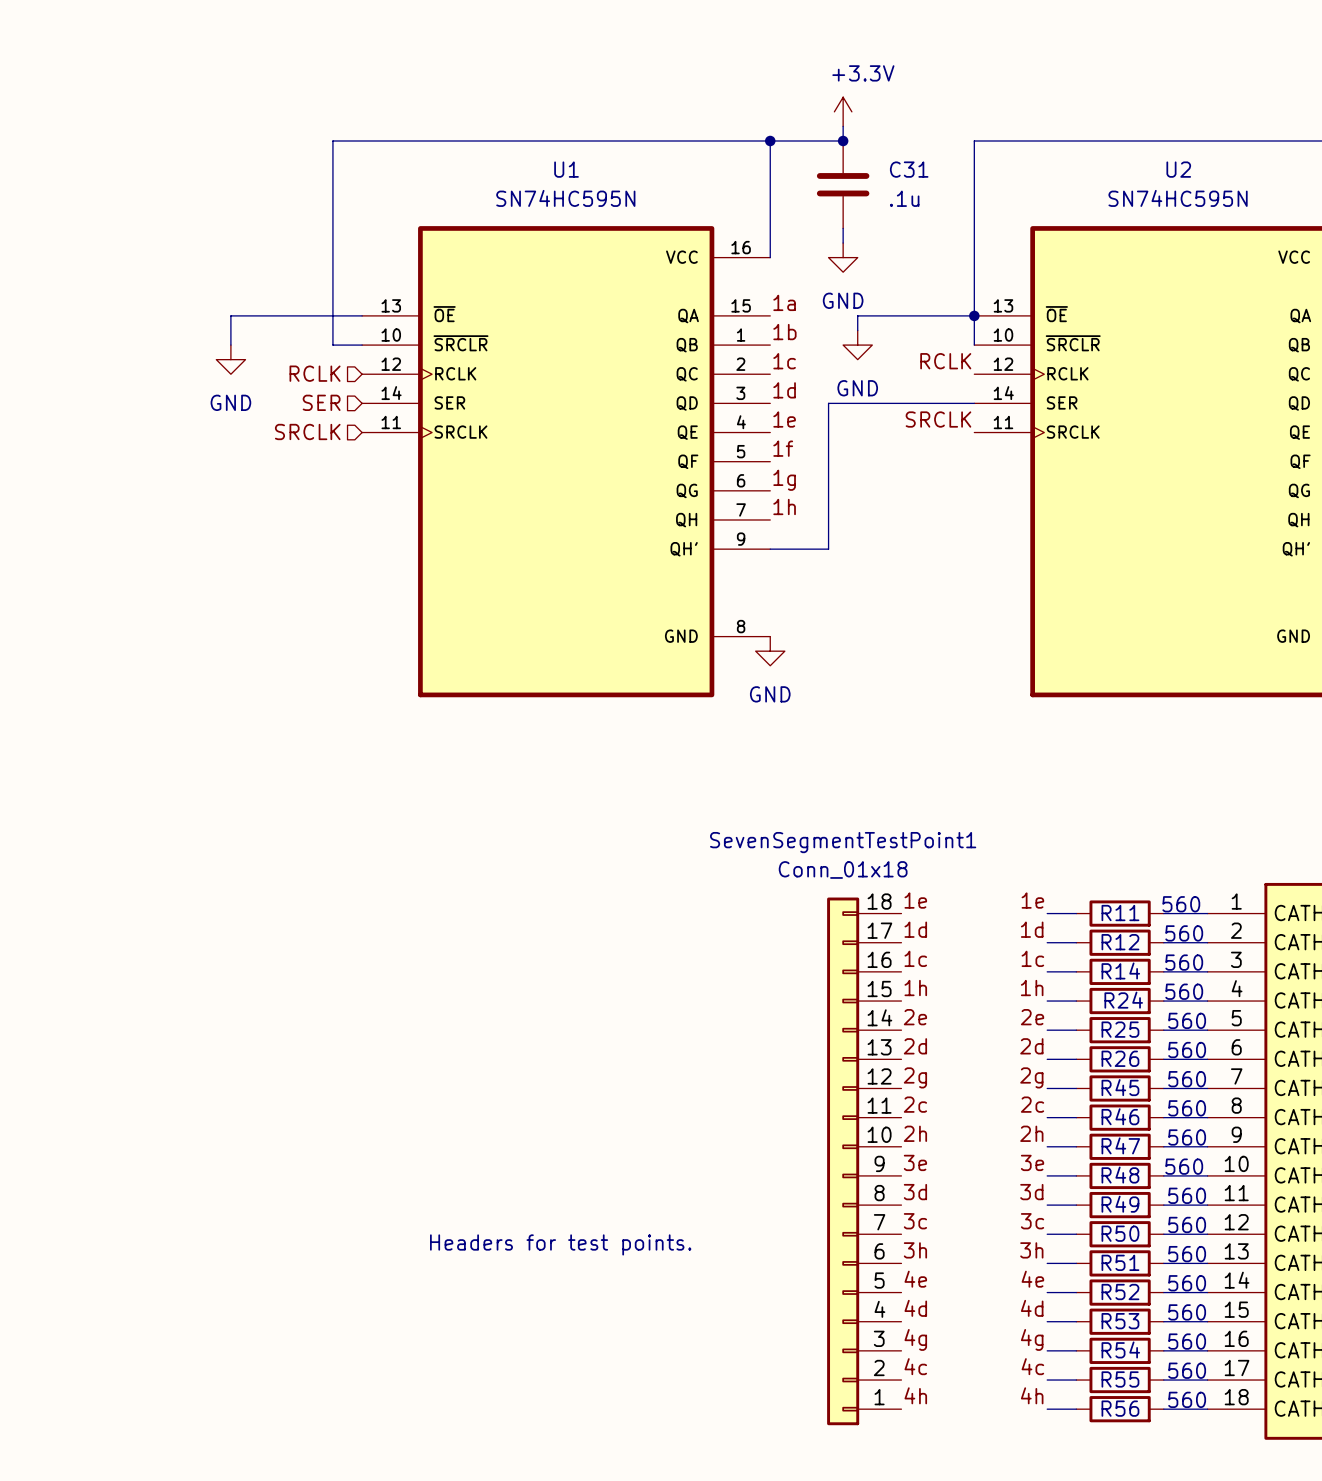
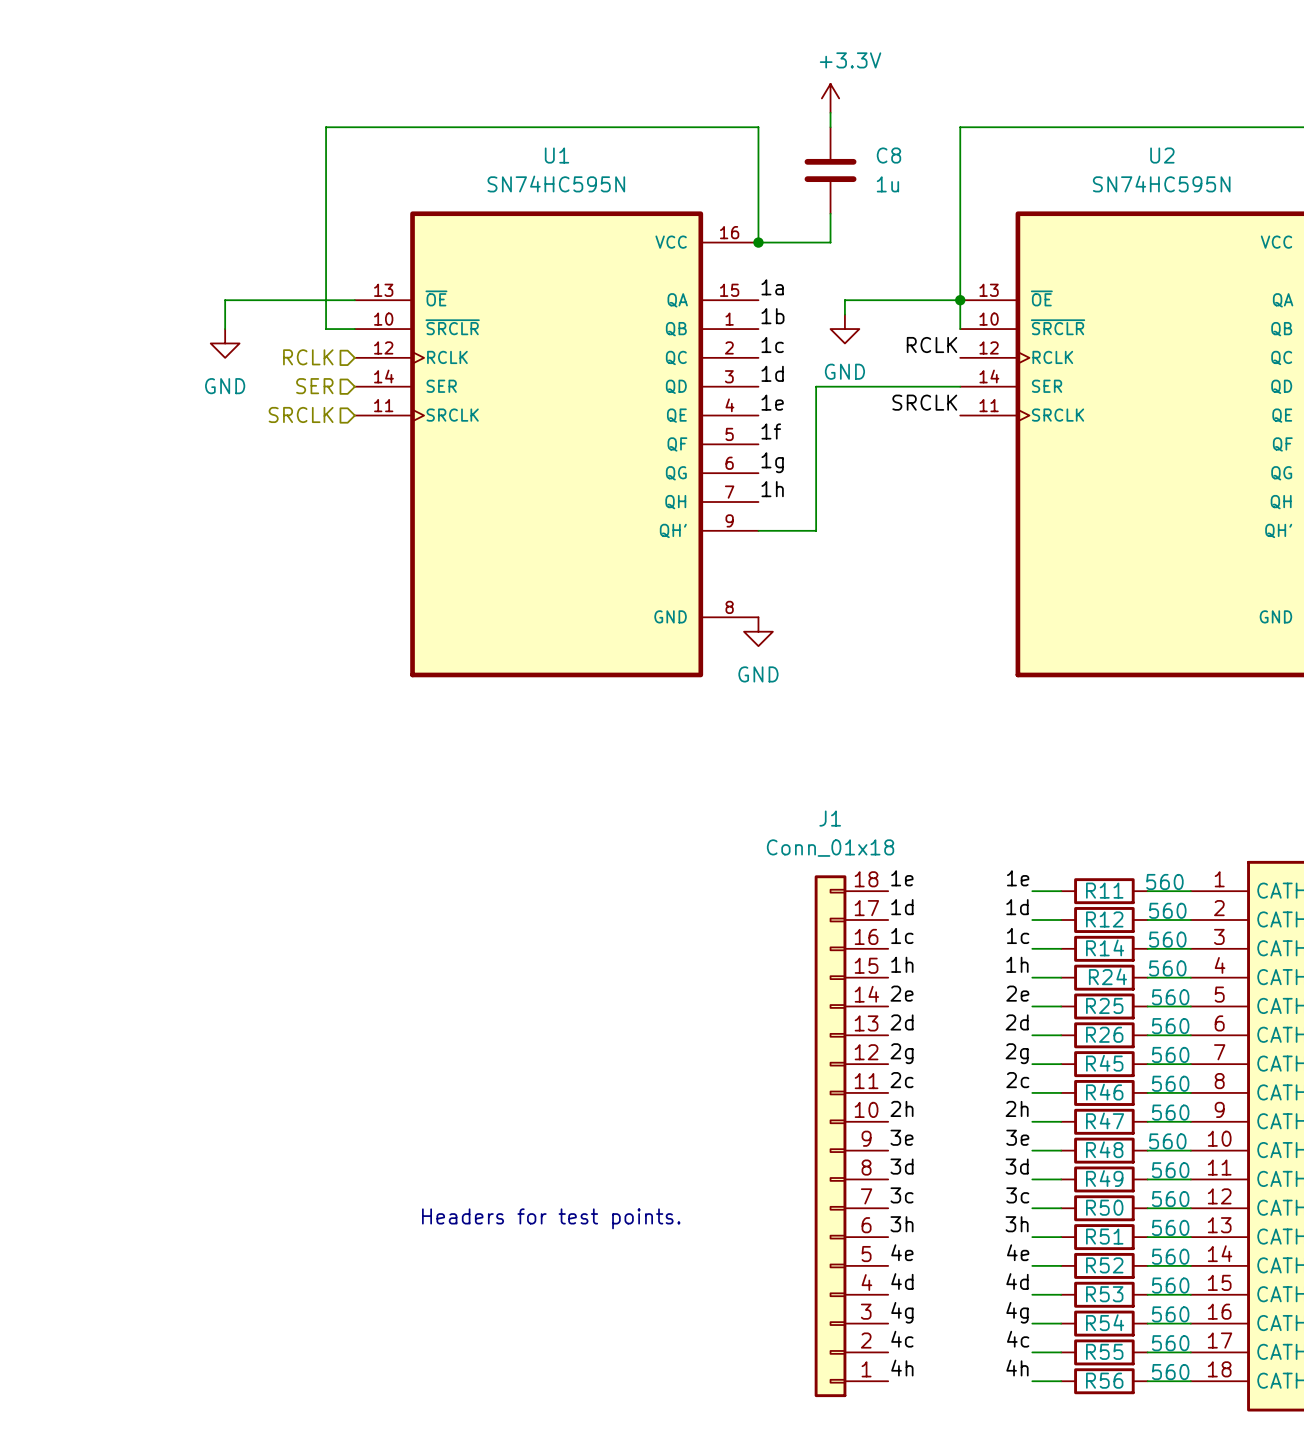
wire: (770, 140) (843, 140) -> none
junction: (770, 140) -> none
junction: (843, 140) -> none
C31 name: C31 (909, 169) -> C8 (888, 155)
C31 value: .1u (904, 198) -> 1u (887, 184)
wire: none -> (830, 228) (830, 242) (758, 242)
junction: none -> (758, 242)
power symbol: GND (843, 257) -> none
SevenSegmentTestPoint1 name: SevenSegmentTestPoint1 (843, 842) -> J1 (830, 818)

